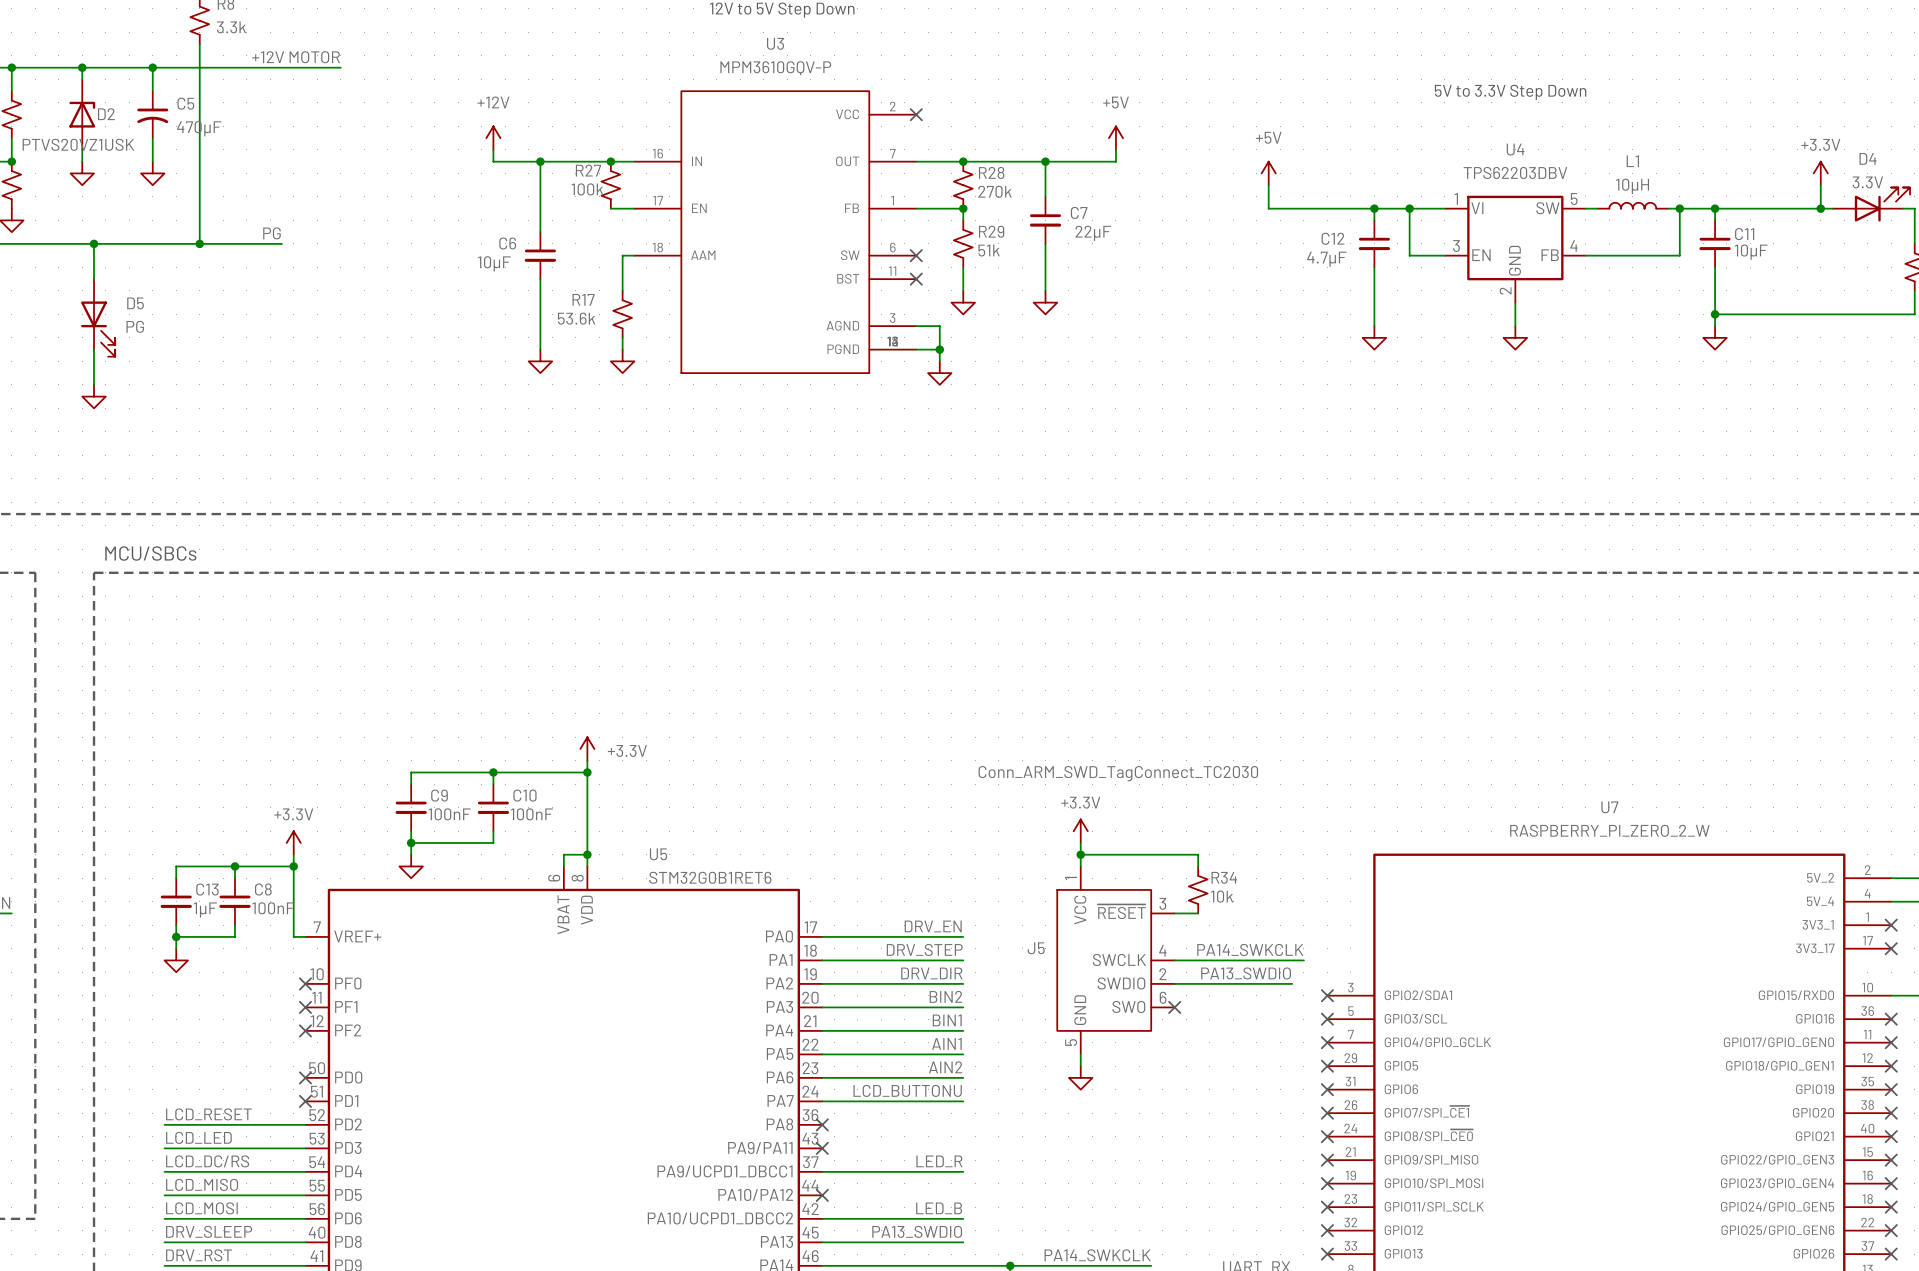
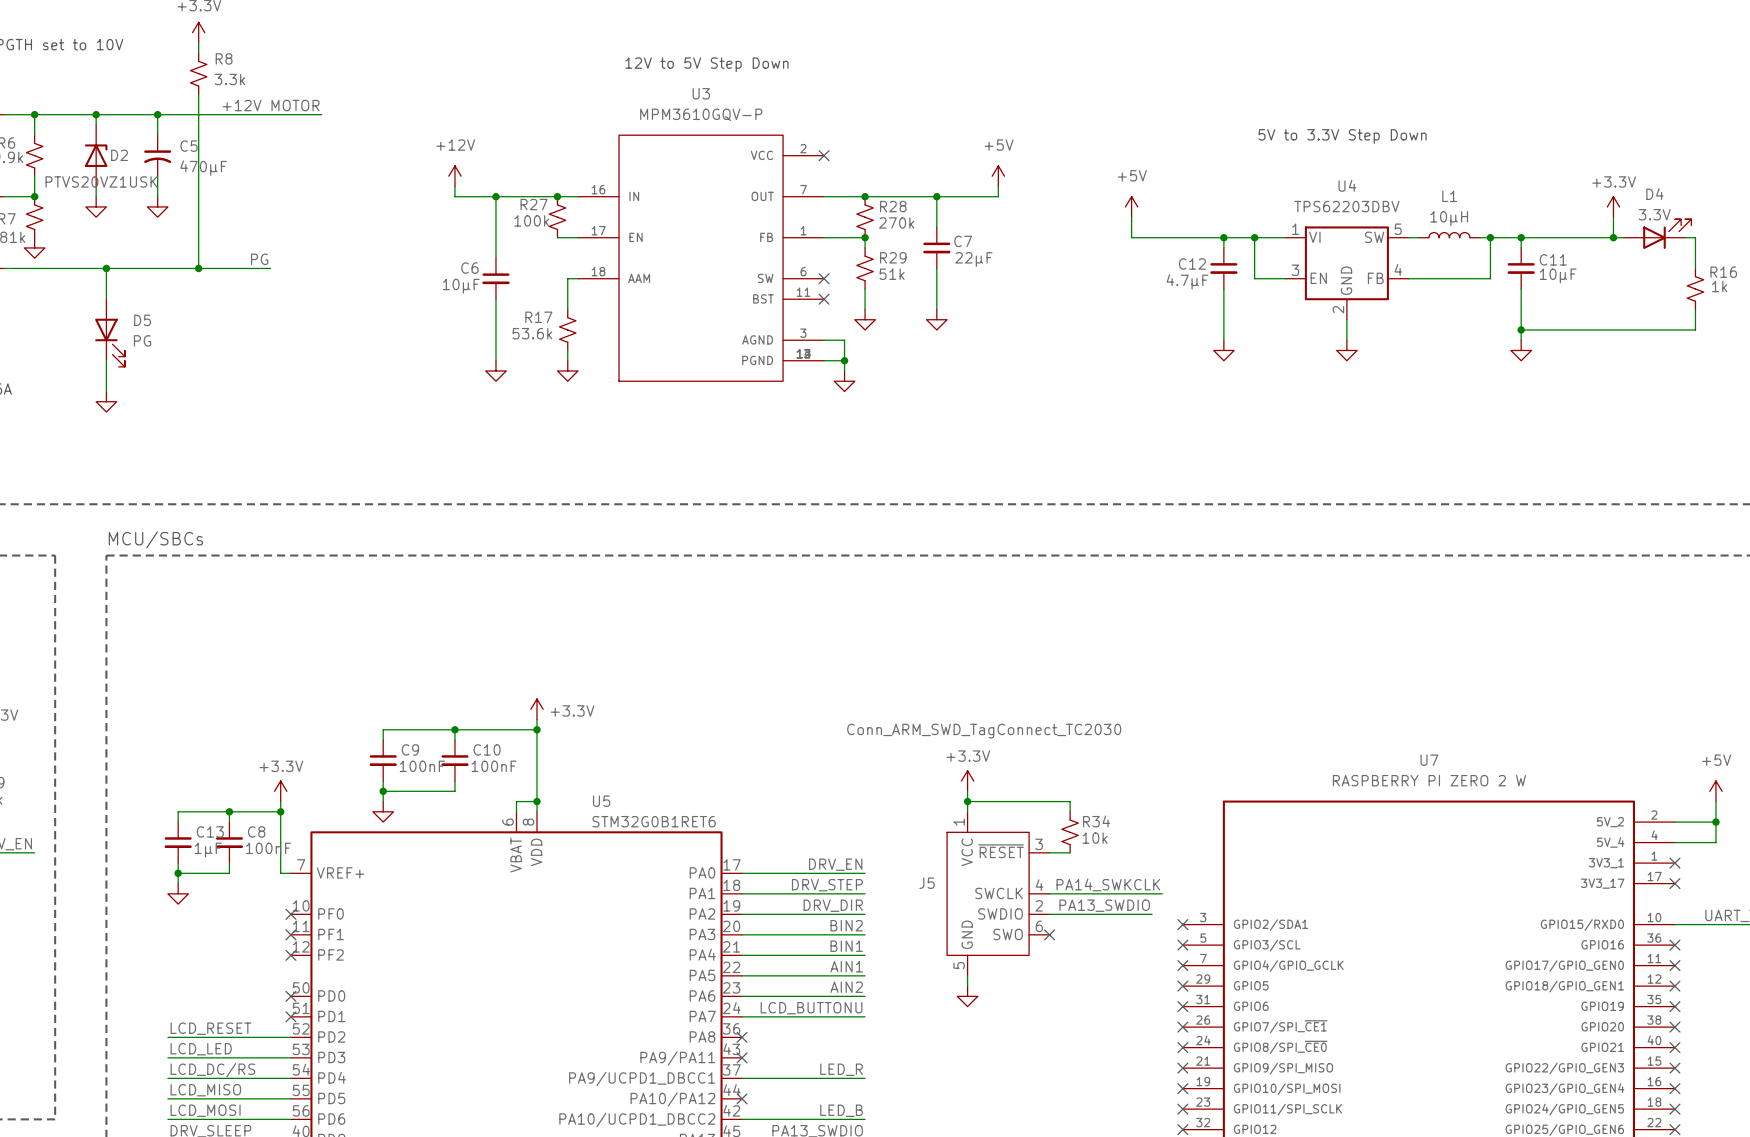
U7 value: RASPBERRY_PI_ZERO_2_W (1609, 830) -> RASPBERRY PI ZERO 2 W (1429, 780)

